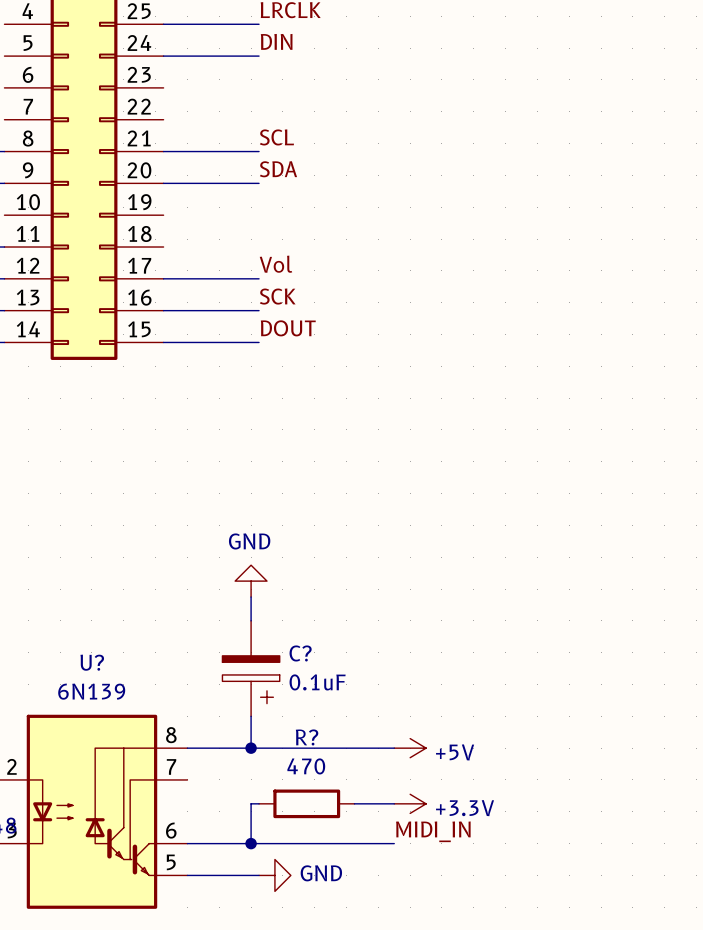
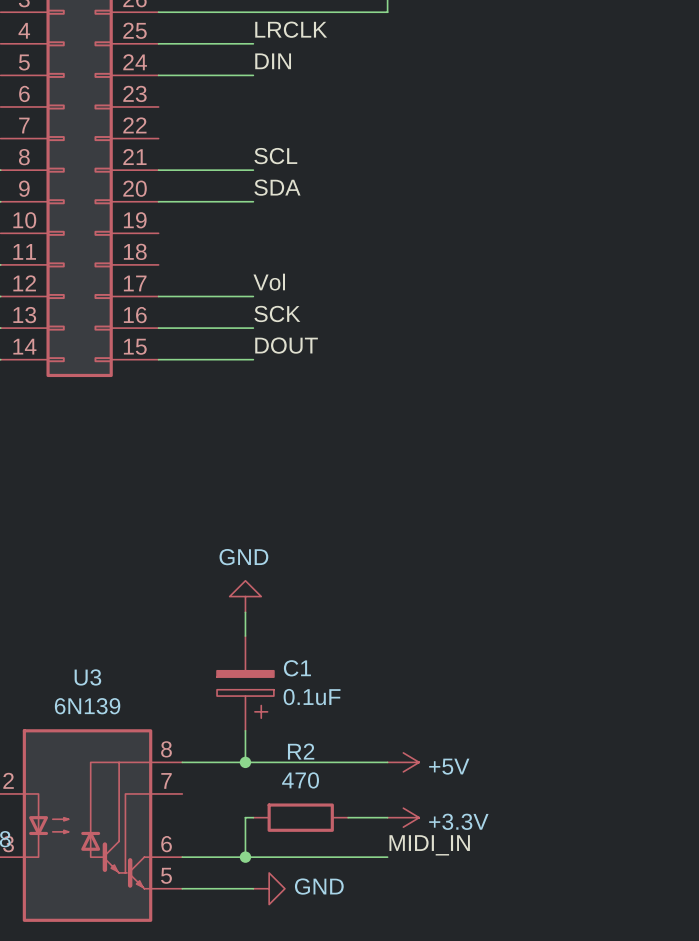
C? name: C? (300, 653) -> C1 (297, 668)
U? name: U? (92, 662) -> U3 (87, 677)
R? name: R? (307, 737) -> R2 (301, 751)

